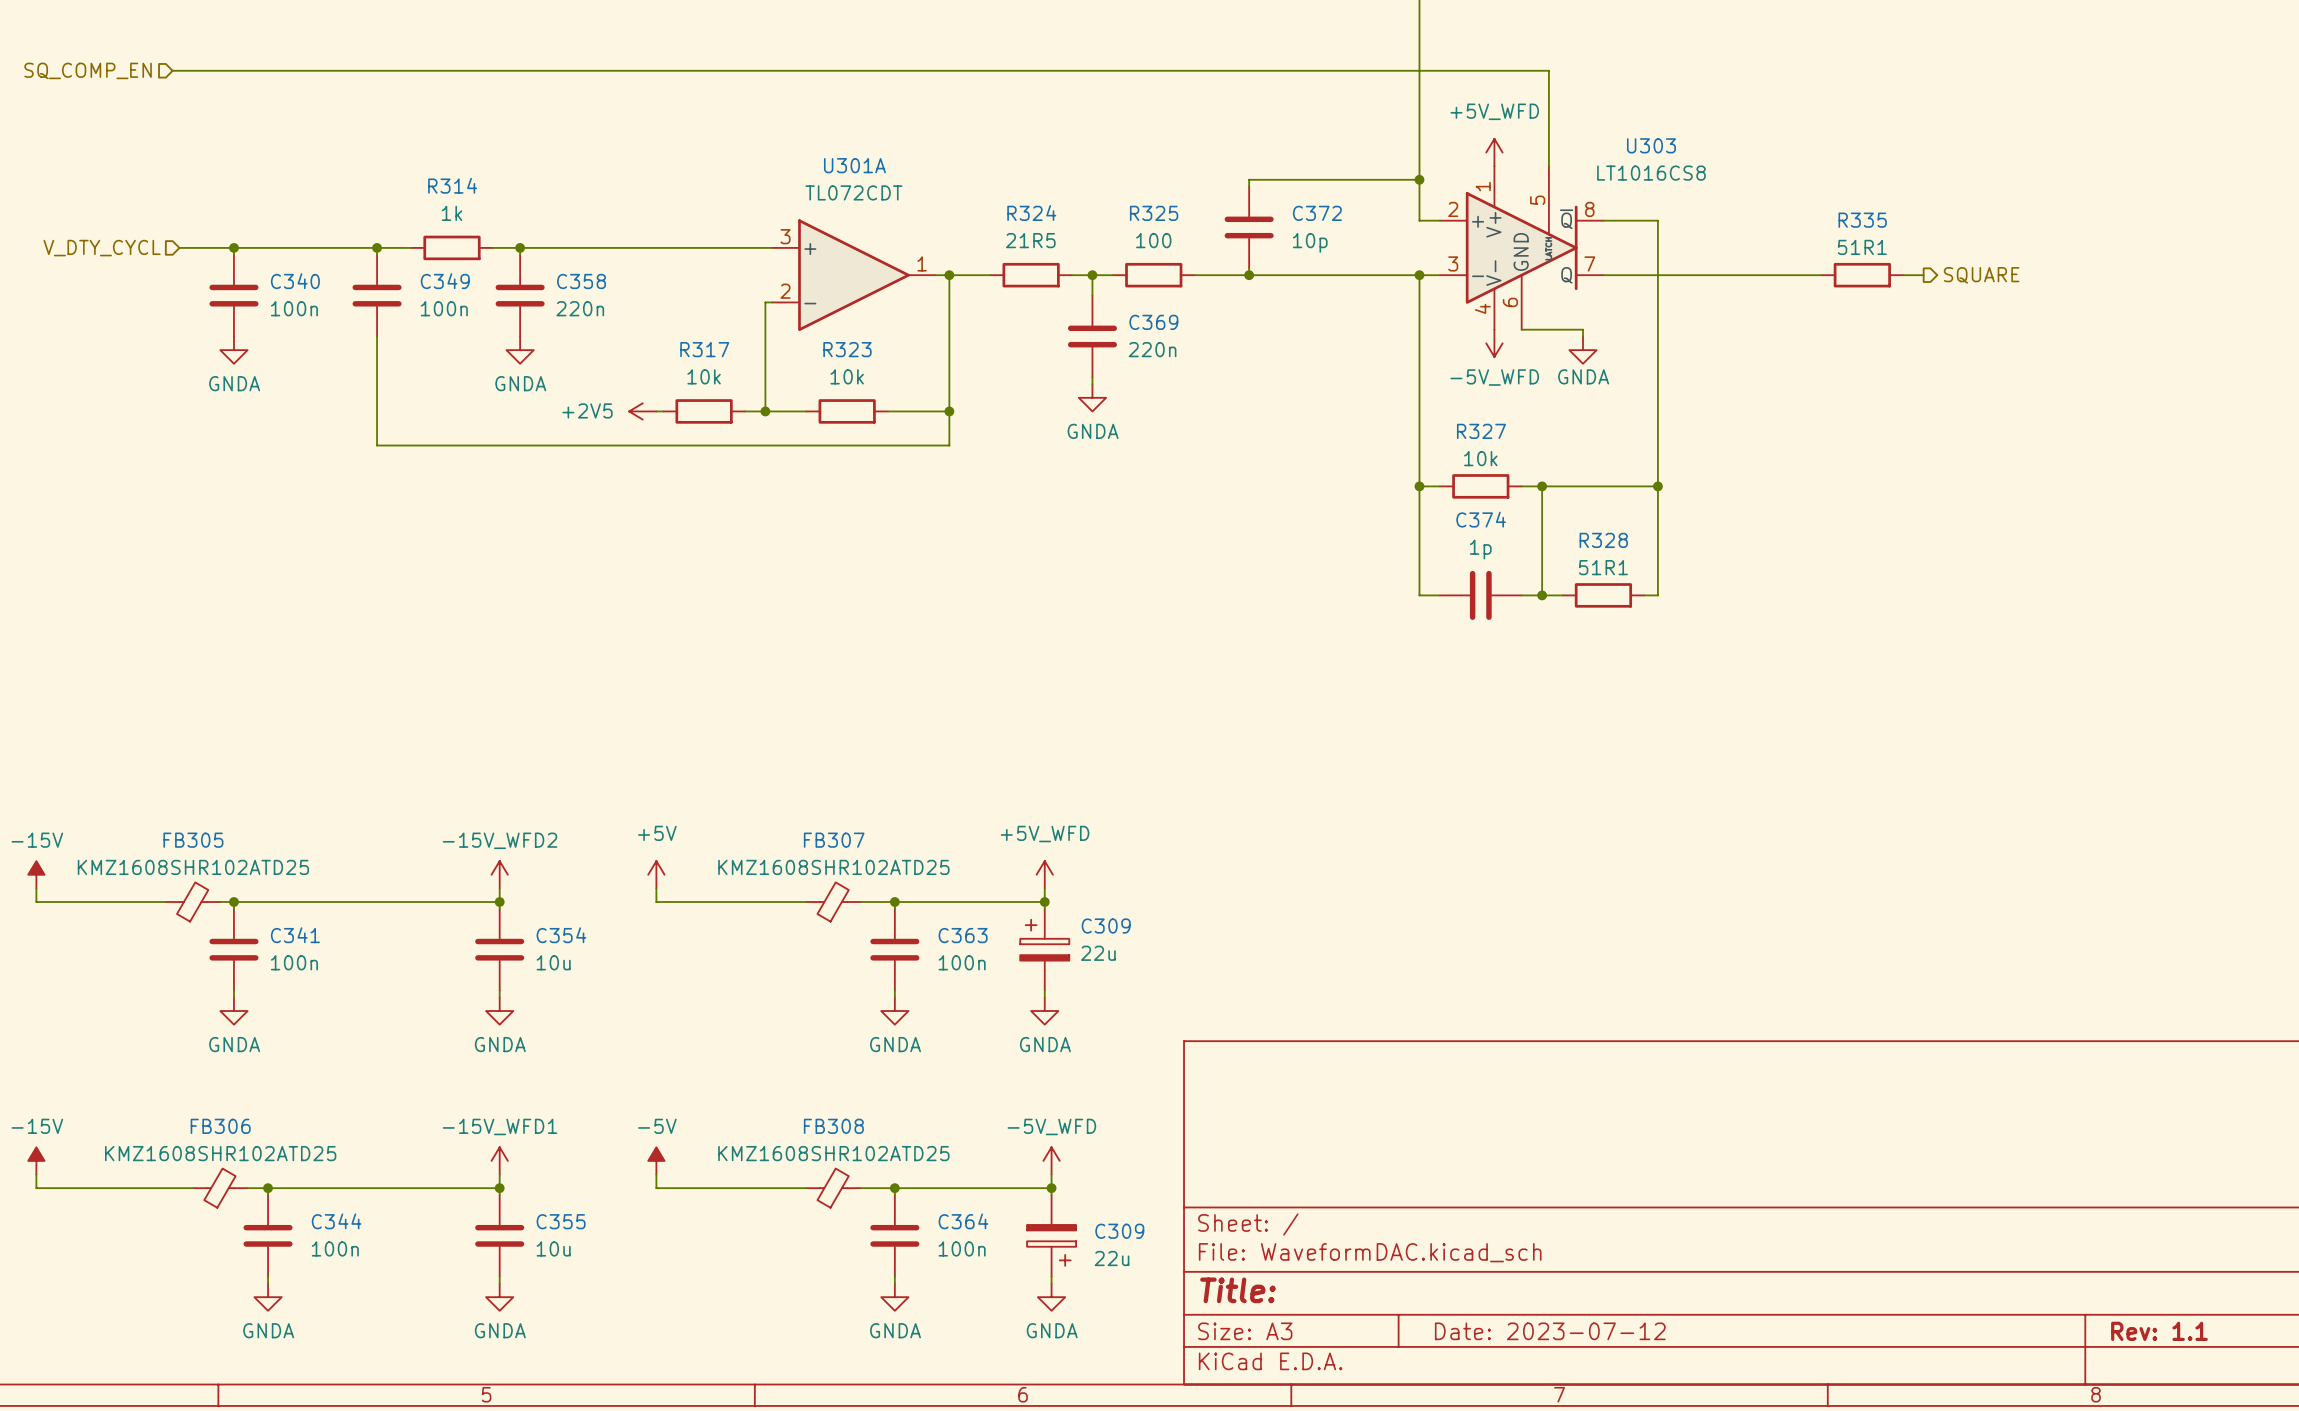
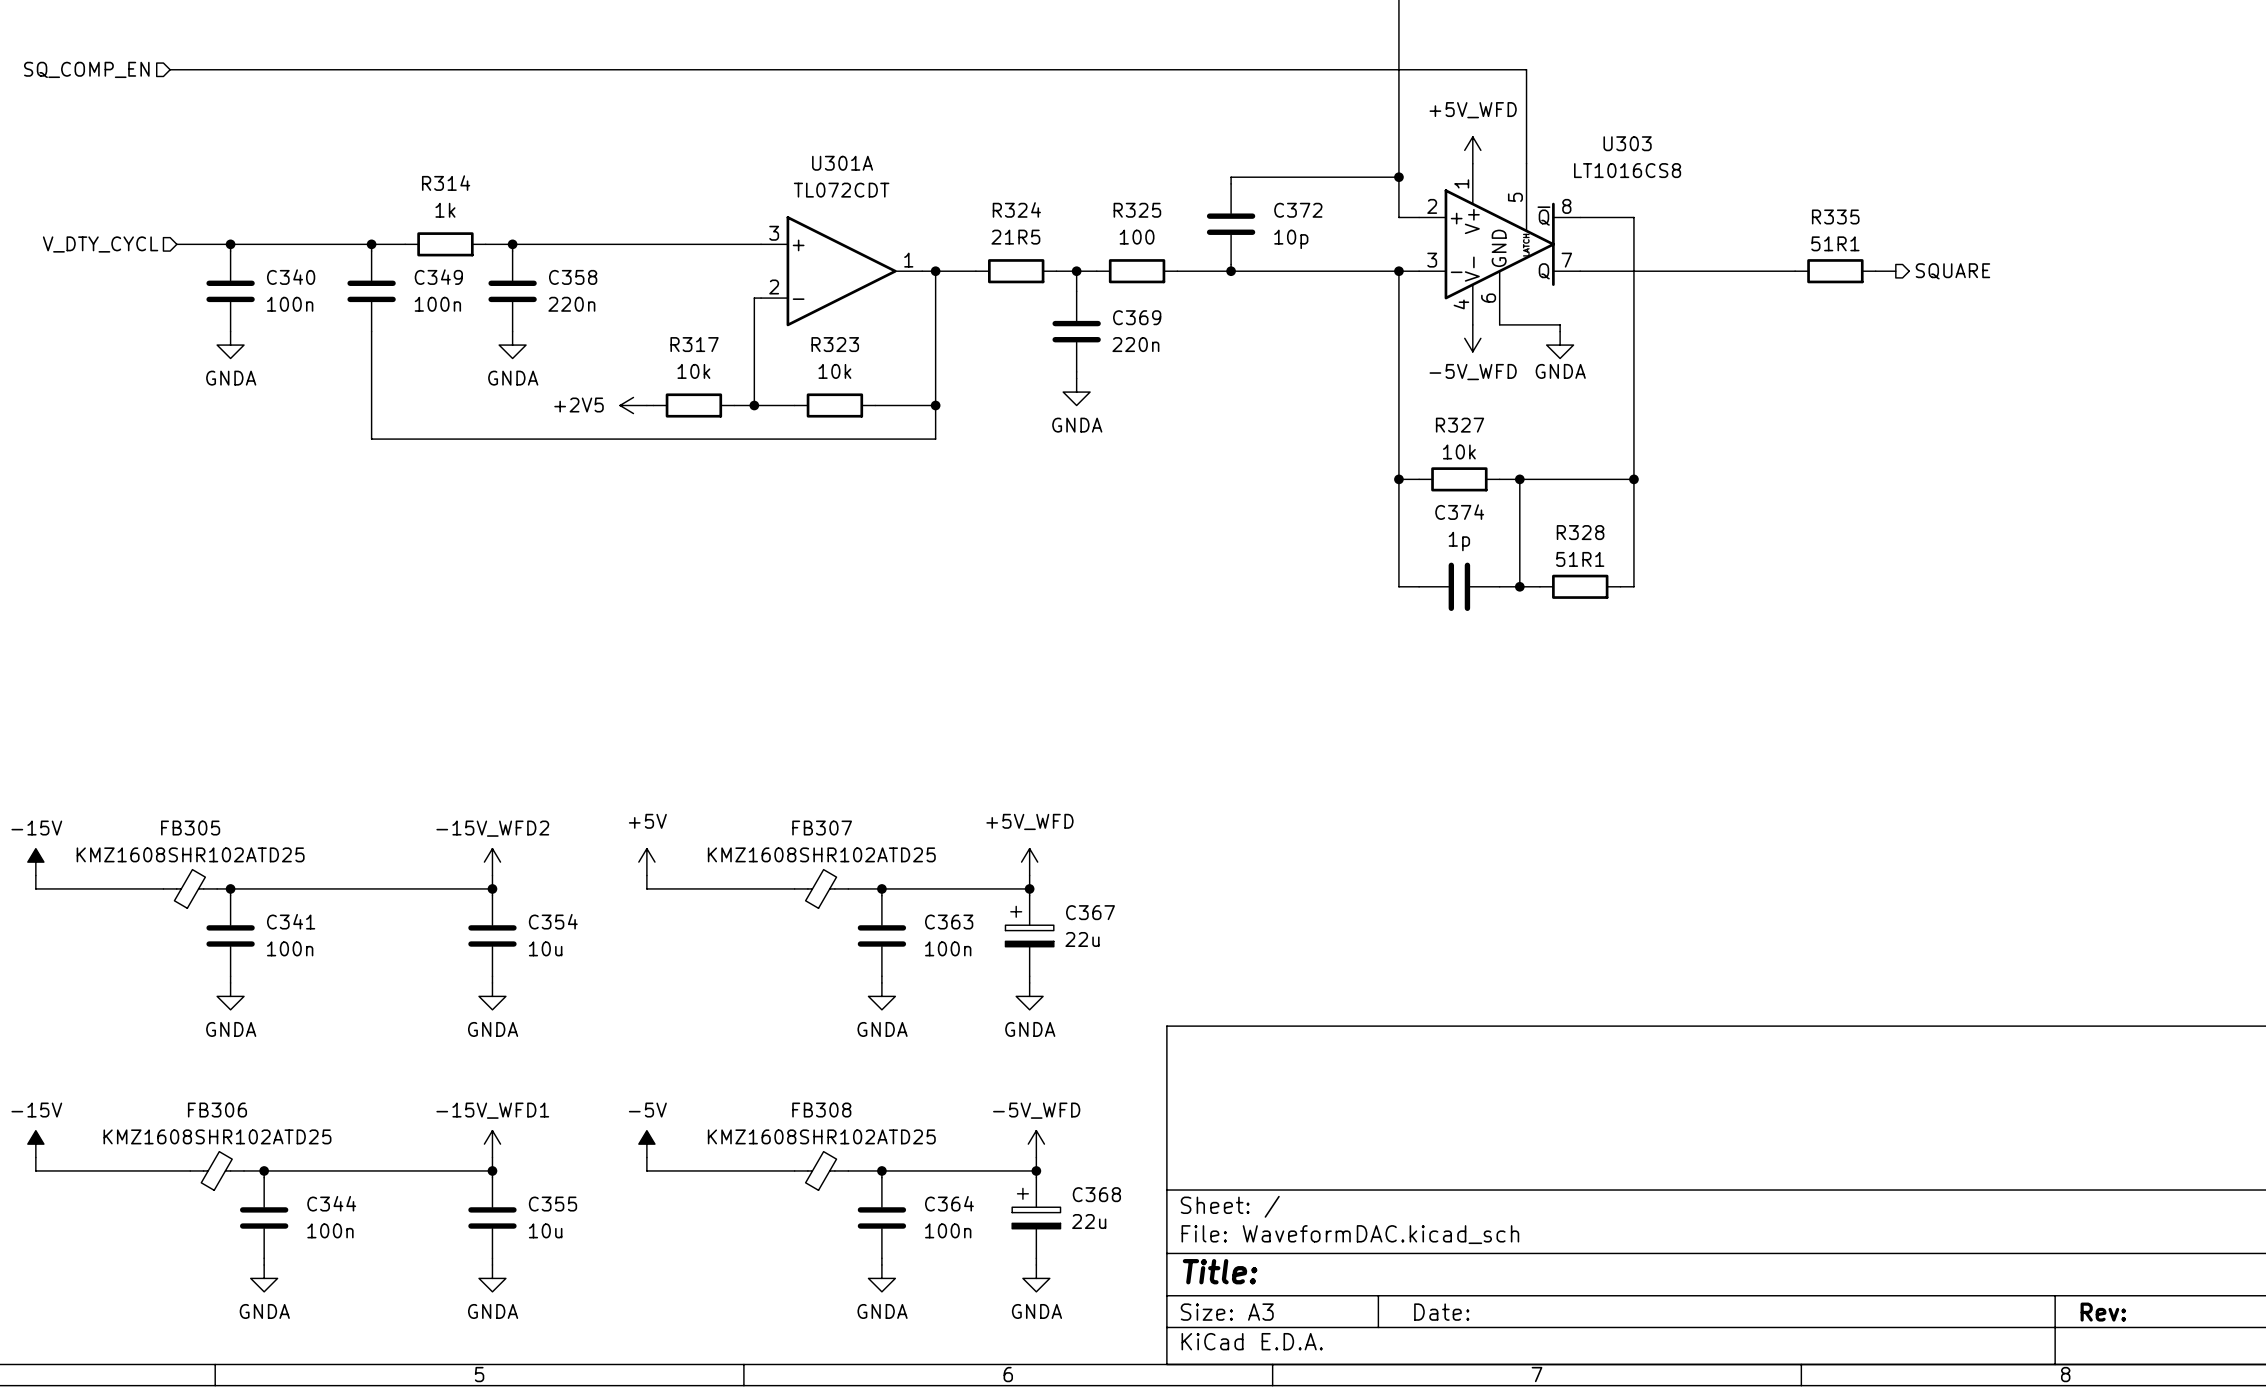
C309 name: C309 (1106, 926) -> C367 (1090, 912)
C309: 22u (1051, 1235) -> none
C368: none -> 22u (1036, 1217)
title block: Date: 2023-07-12 (1550, 1331) -> Date: (1441, 1312)
title block: Rev: 1.1 (2159, 1331) -> Rev: (2103, 1312)

